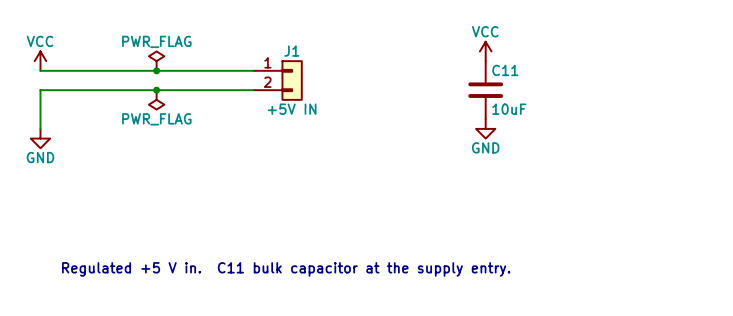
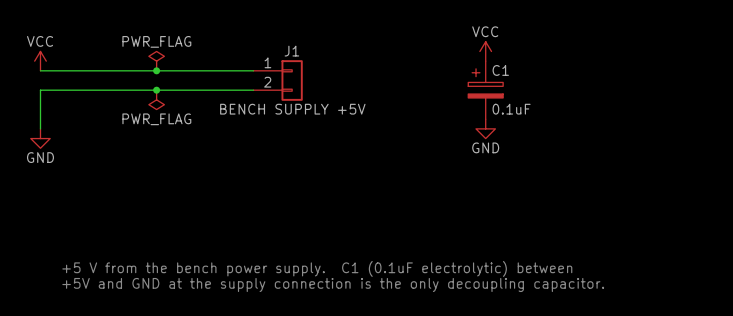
C11: 10uF (485, 90) -> none
C1: none -> 0.1uF (485, 90)
J1 value: +5V IN (292, 109) -> BENCH SUPPLY +5V (292, 109)
text: Regulated +5 V in. C11 bulk capacitor at the supply entry. (286, 269) -> +5 V from the bench power supply. C1 (0.1uF electrolytic) between (317, 268)
text: none -> +5V and GND at the supply connection is the only decoupling capacitor. (333, 284)

